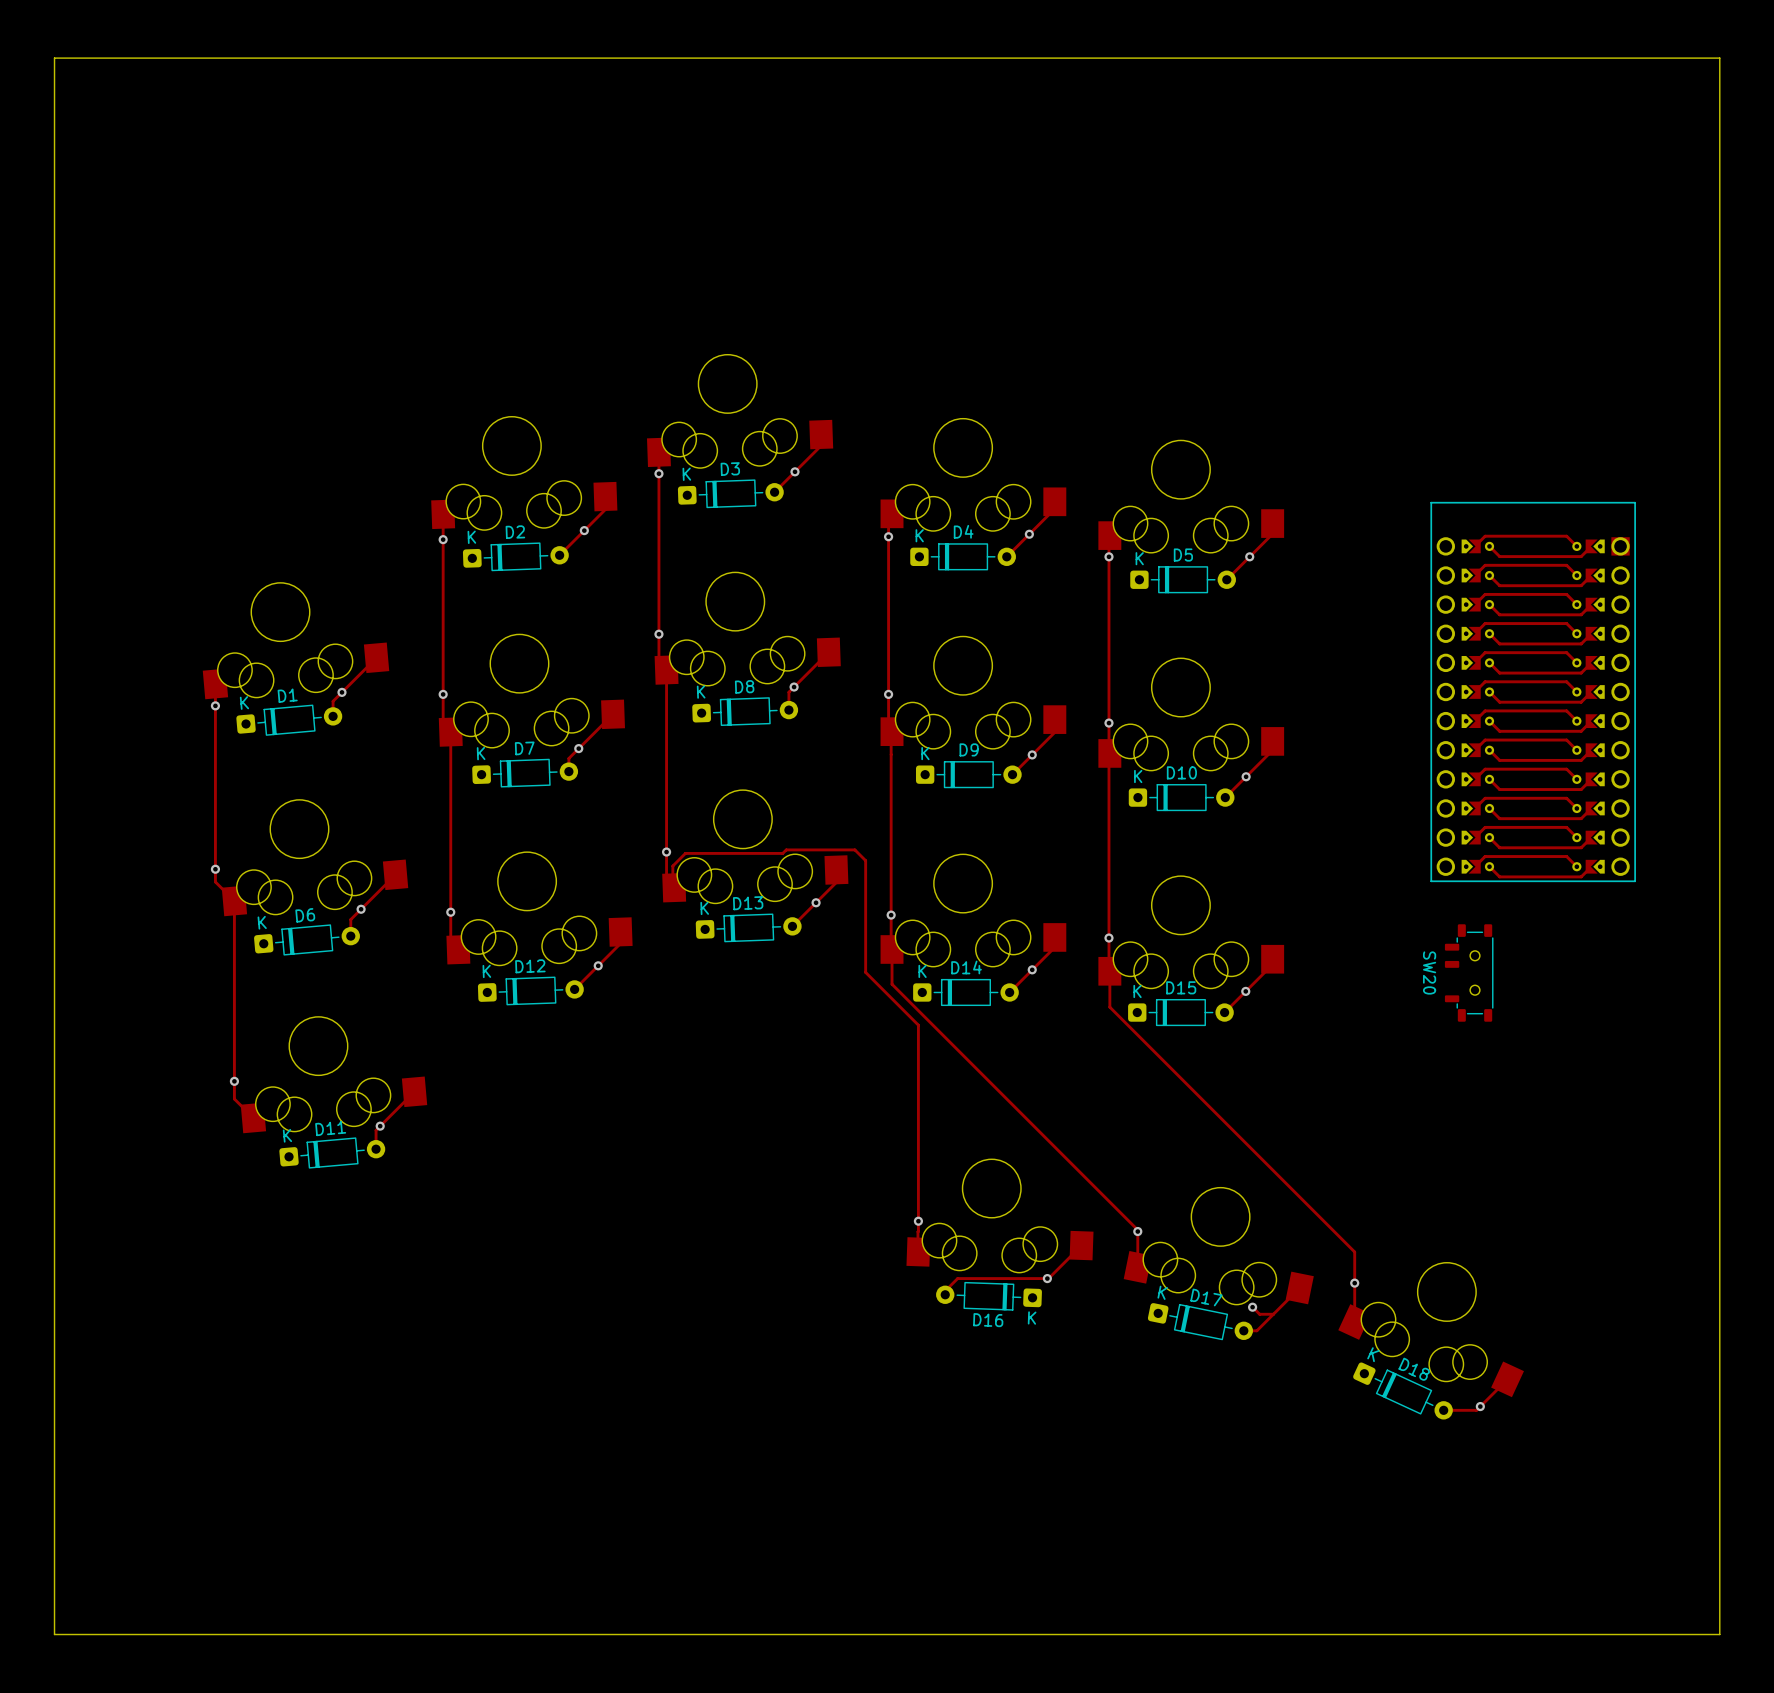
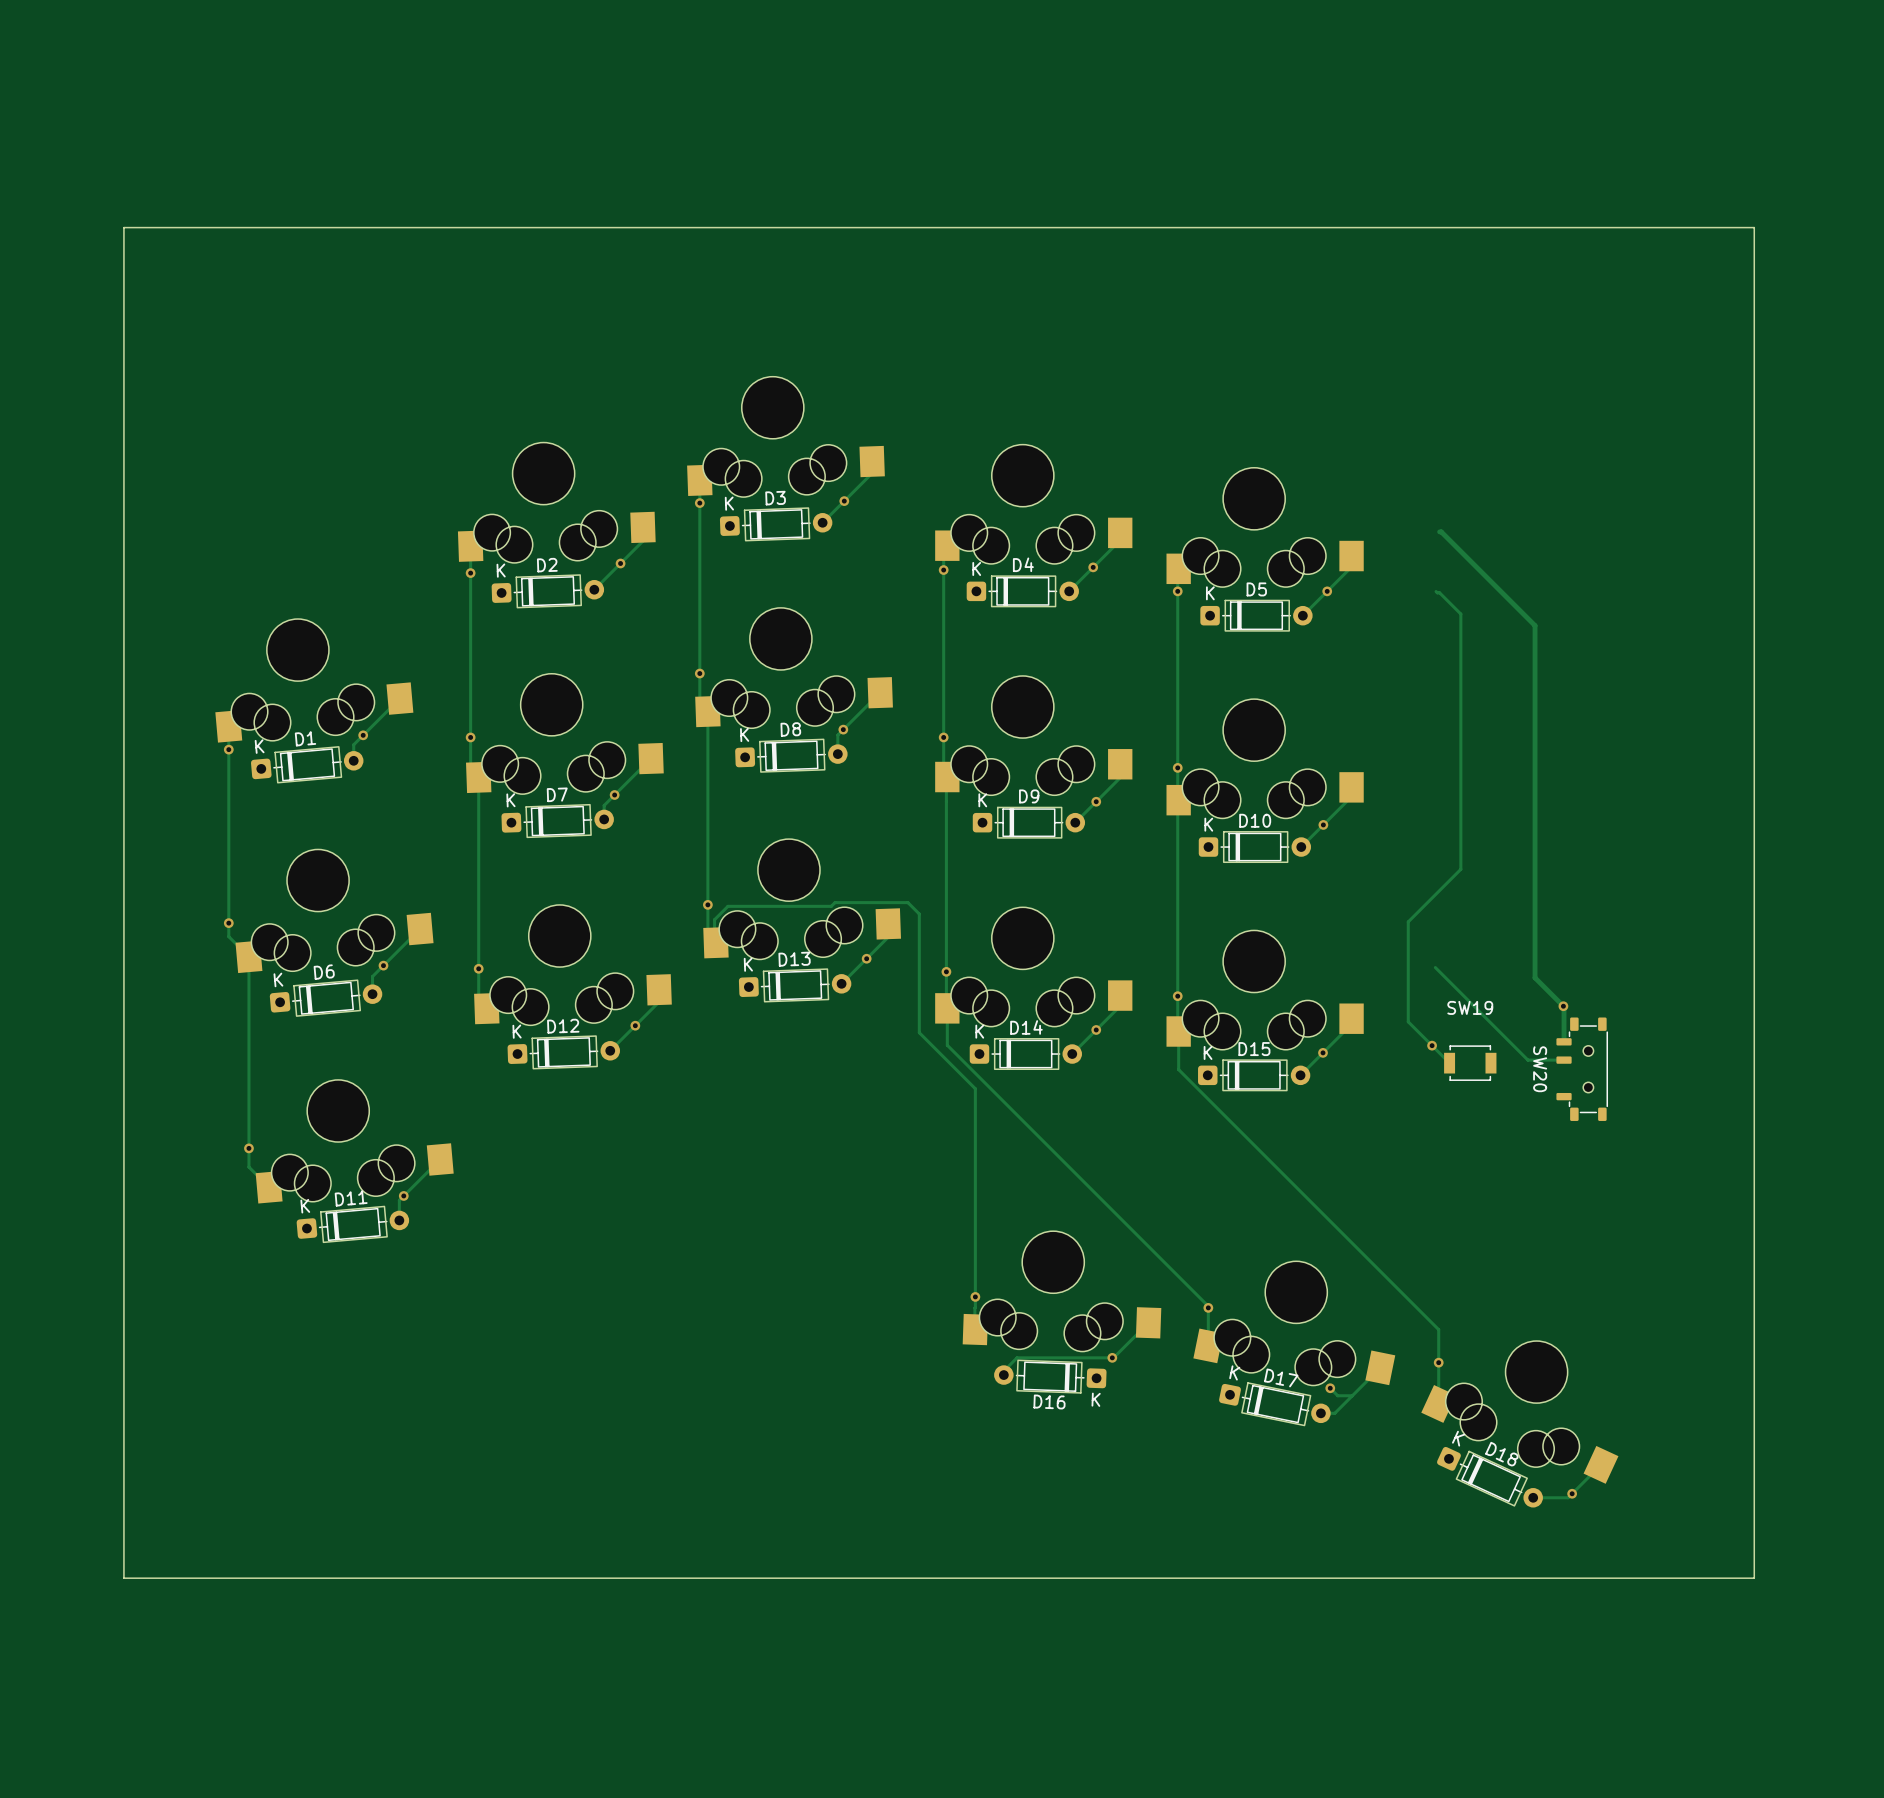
board edge: (54, 58) (1719, 58) (1719, 1634) (54, 1634) (54, 58) -> (123, 227) (123, 1578) (1754, 1578) (1754, 227) (123, 227)
D3 footprint: [677, 479, 784, 509] -> [719, 507, 833, 541]
track: none -> (1439, 531) (1535, 625) (1535, 977) (1564, 1006) (1564, 1041)
D2 footprint: [462, 542, 569, 572] -> [491, 574, 605, 608]
D4 footprint: [910, 543, 1016, 571] -> [966, 575, 1079, 607]
track: none -> (1436, 591) (1460, 614) (1460, 869) (1408, 921) (1408, 1021) (1449, 1063)
D5 footprint: [1130, 566, 1236, 594] -> [1200, 600, 1313, 632]
part: (1533, 691) -> none
D8 footprint: [692, 697, 799, 726] -> [735, 739, 848, 773]
D1 footprint: [236, 704, 343, 736] -> [250, 746, 364, 784]
D7 footprint: [472, 758, 579, 788] -> [501, 804, 614, 838]
D9 footprint: [915, 761, 1022, 789] -> [972, 807, 1086, 839]
D10 footprint: [1128, 784, 1235, 812] -> [1198, 831, 1312, 863]
track: none -> (1435, 967) (1527, 1060) (1564, 1060)
D13 footprint: [695, 913, 802, 943] -> [738, 968, 852, 1003]
D6 footprint: [254, 924, 360, 956] -> [269, 979, 383, 1017]
via: none -> (1563, 1006)
SW20 position: (1469, 972) -> (1582, 1069)
D12 footprint: [477, 976, 584, 1006] -> [507, 1035, 620, 1070]
D14 footprint: [913, 978, 1019, 1007] -> [969, 1038, 1082, 1070]
via: none -> (1432, 1045)
D15 footprint: [1128, 999, 1234, 1027] -> [1198, 1059, 1311, 1091]
SW19: none -> (1470, 1063)
D11 footprint: [279, 1137, 386, 1169] -> [296, 1206, 410, 1243]
D16 footprint: [936, 1281, 1042, 1311] -> [994, 1360, 1107, 1394]
D17 footprint: [1147, 1303, 1253, 1341] -> [1219, 1382, 1331, 1426]
D18 footprint: [1353, 1362, 1453, 1420] -> [1437, 1446, 1543, 1508]

